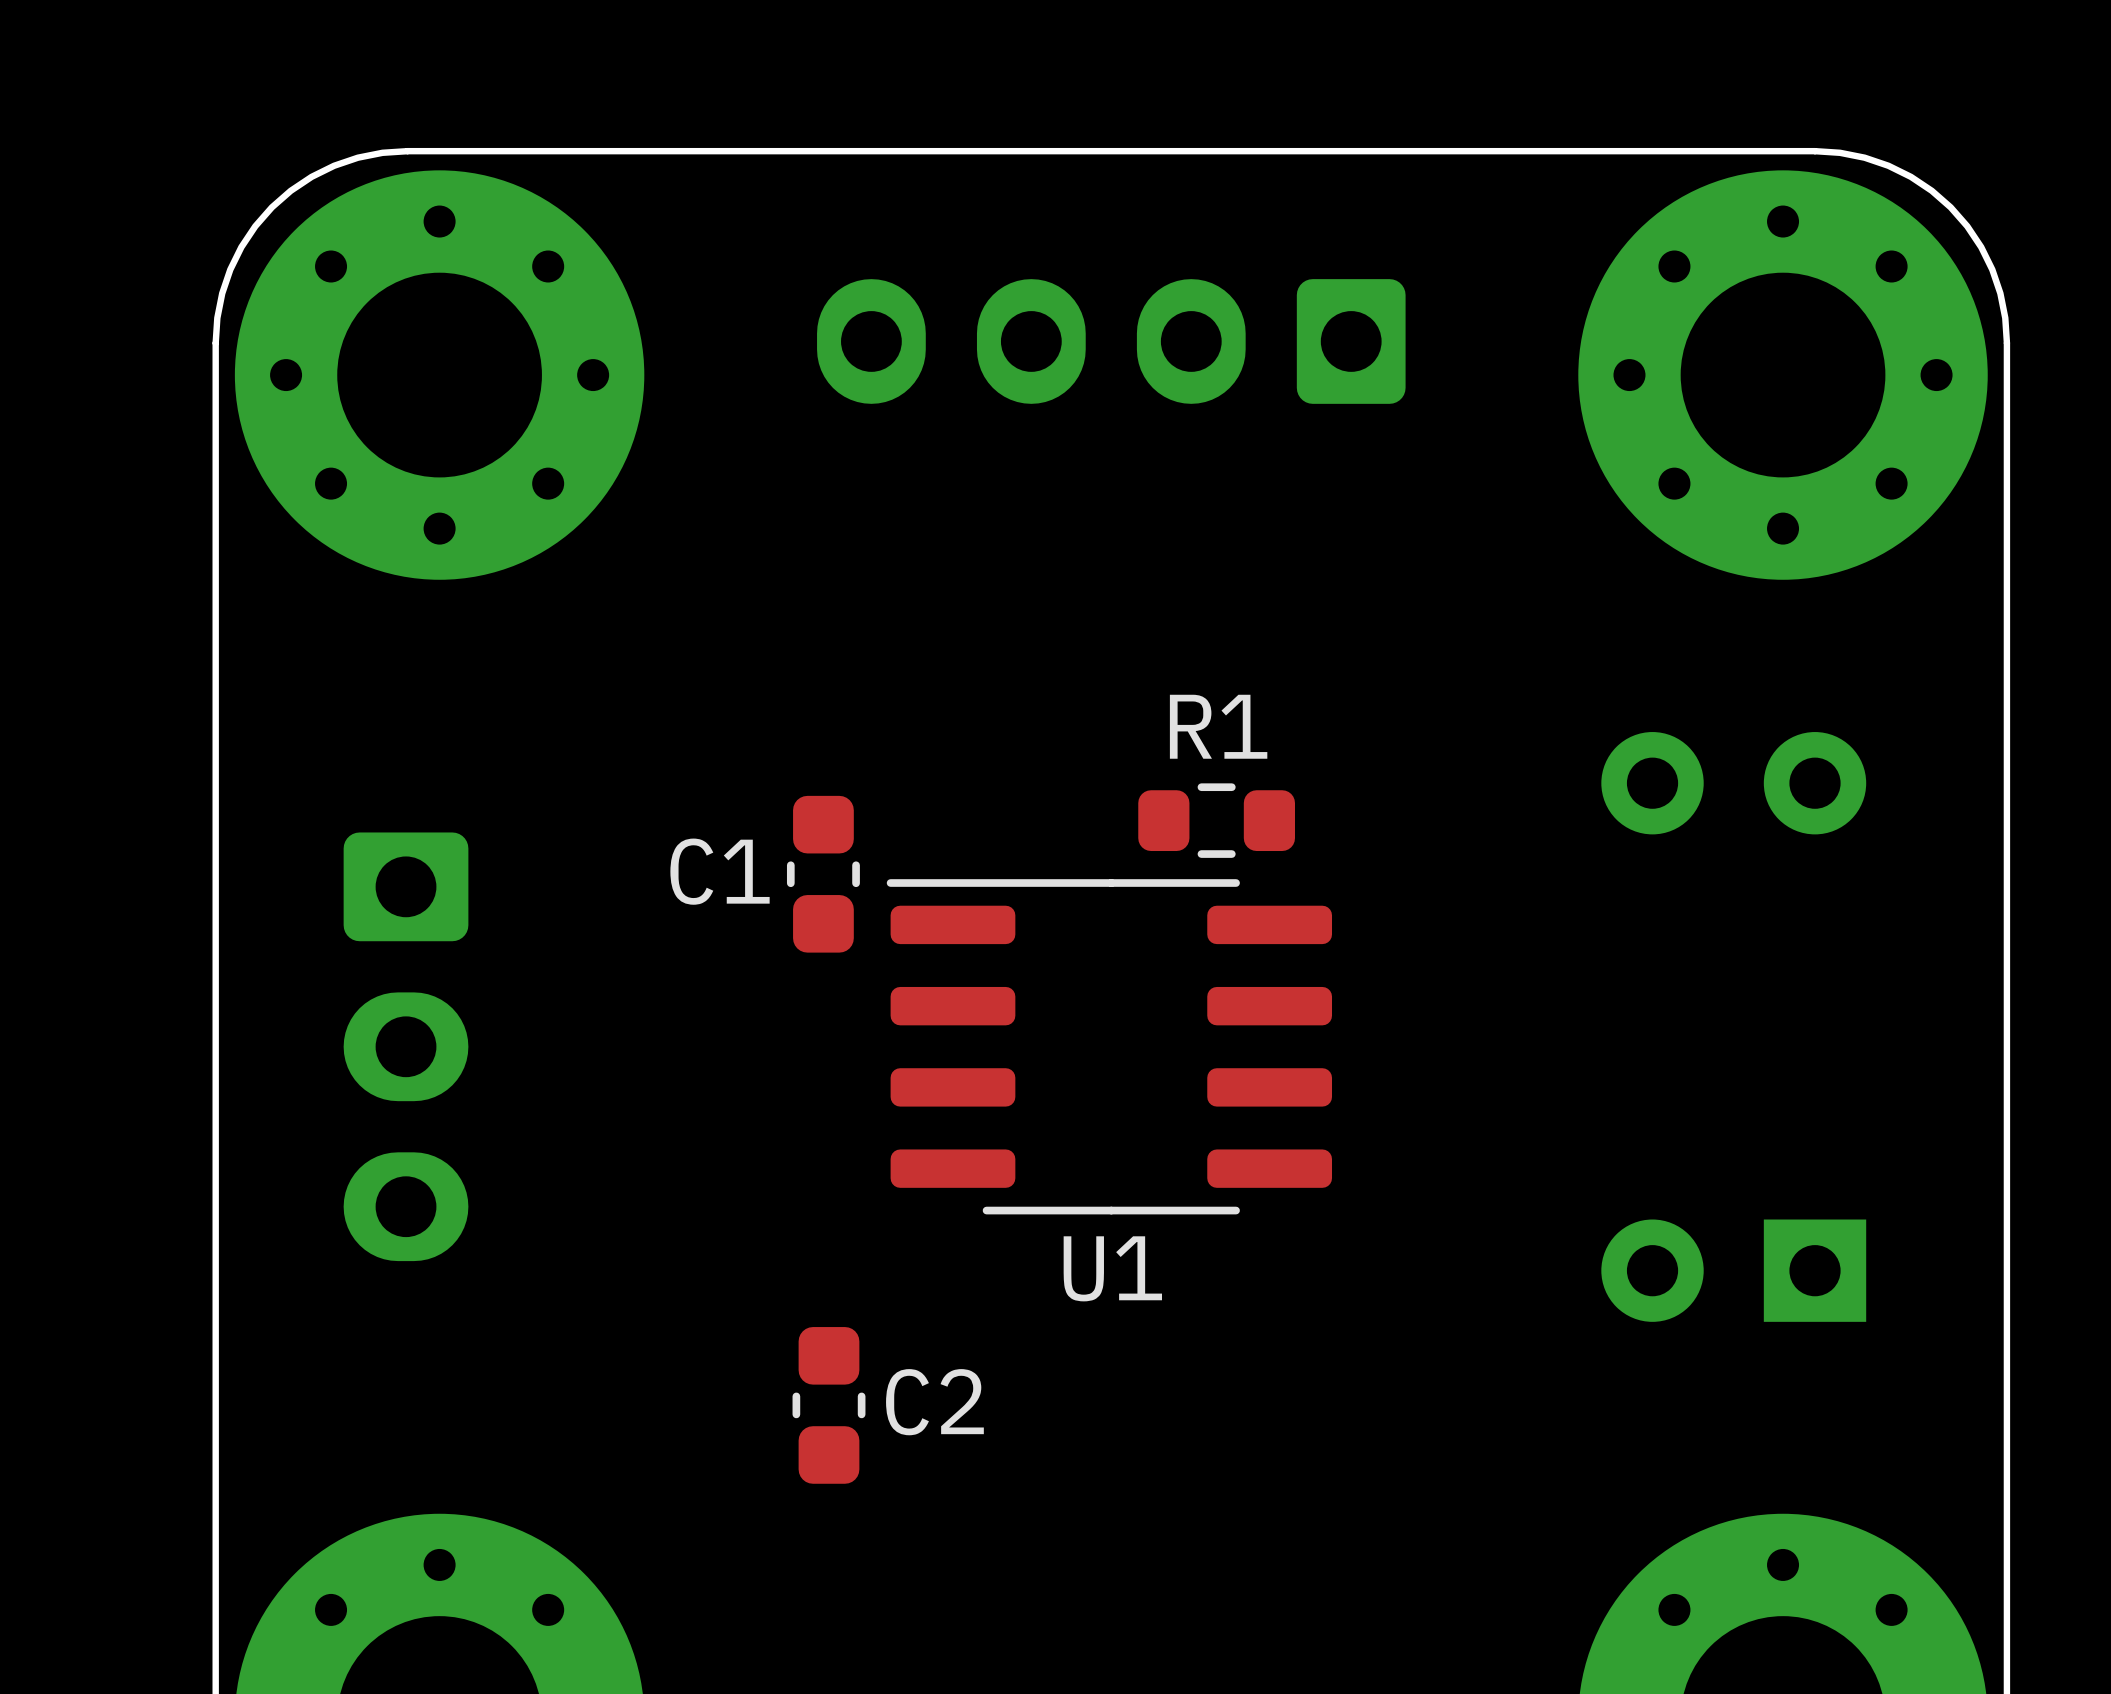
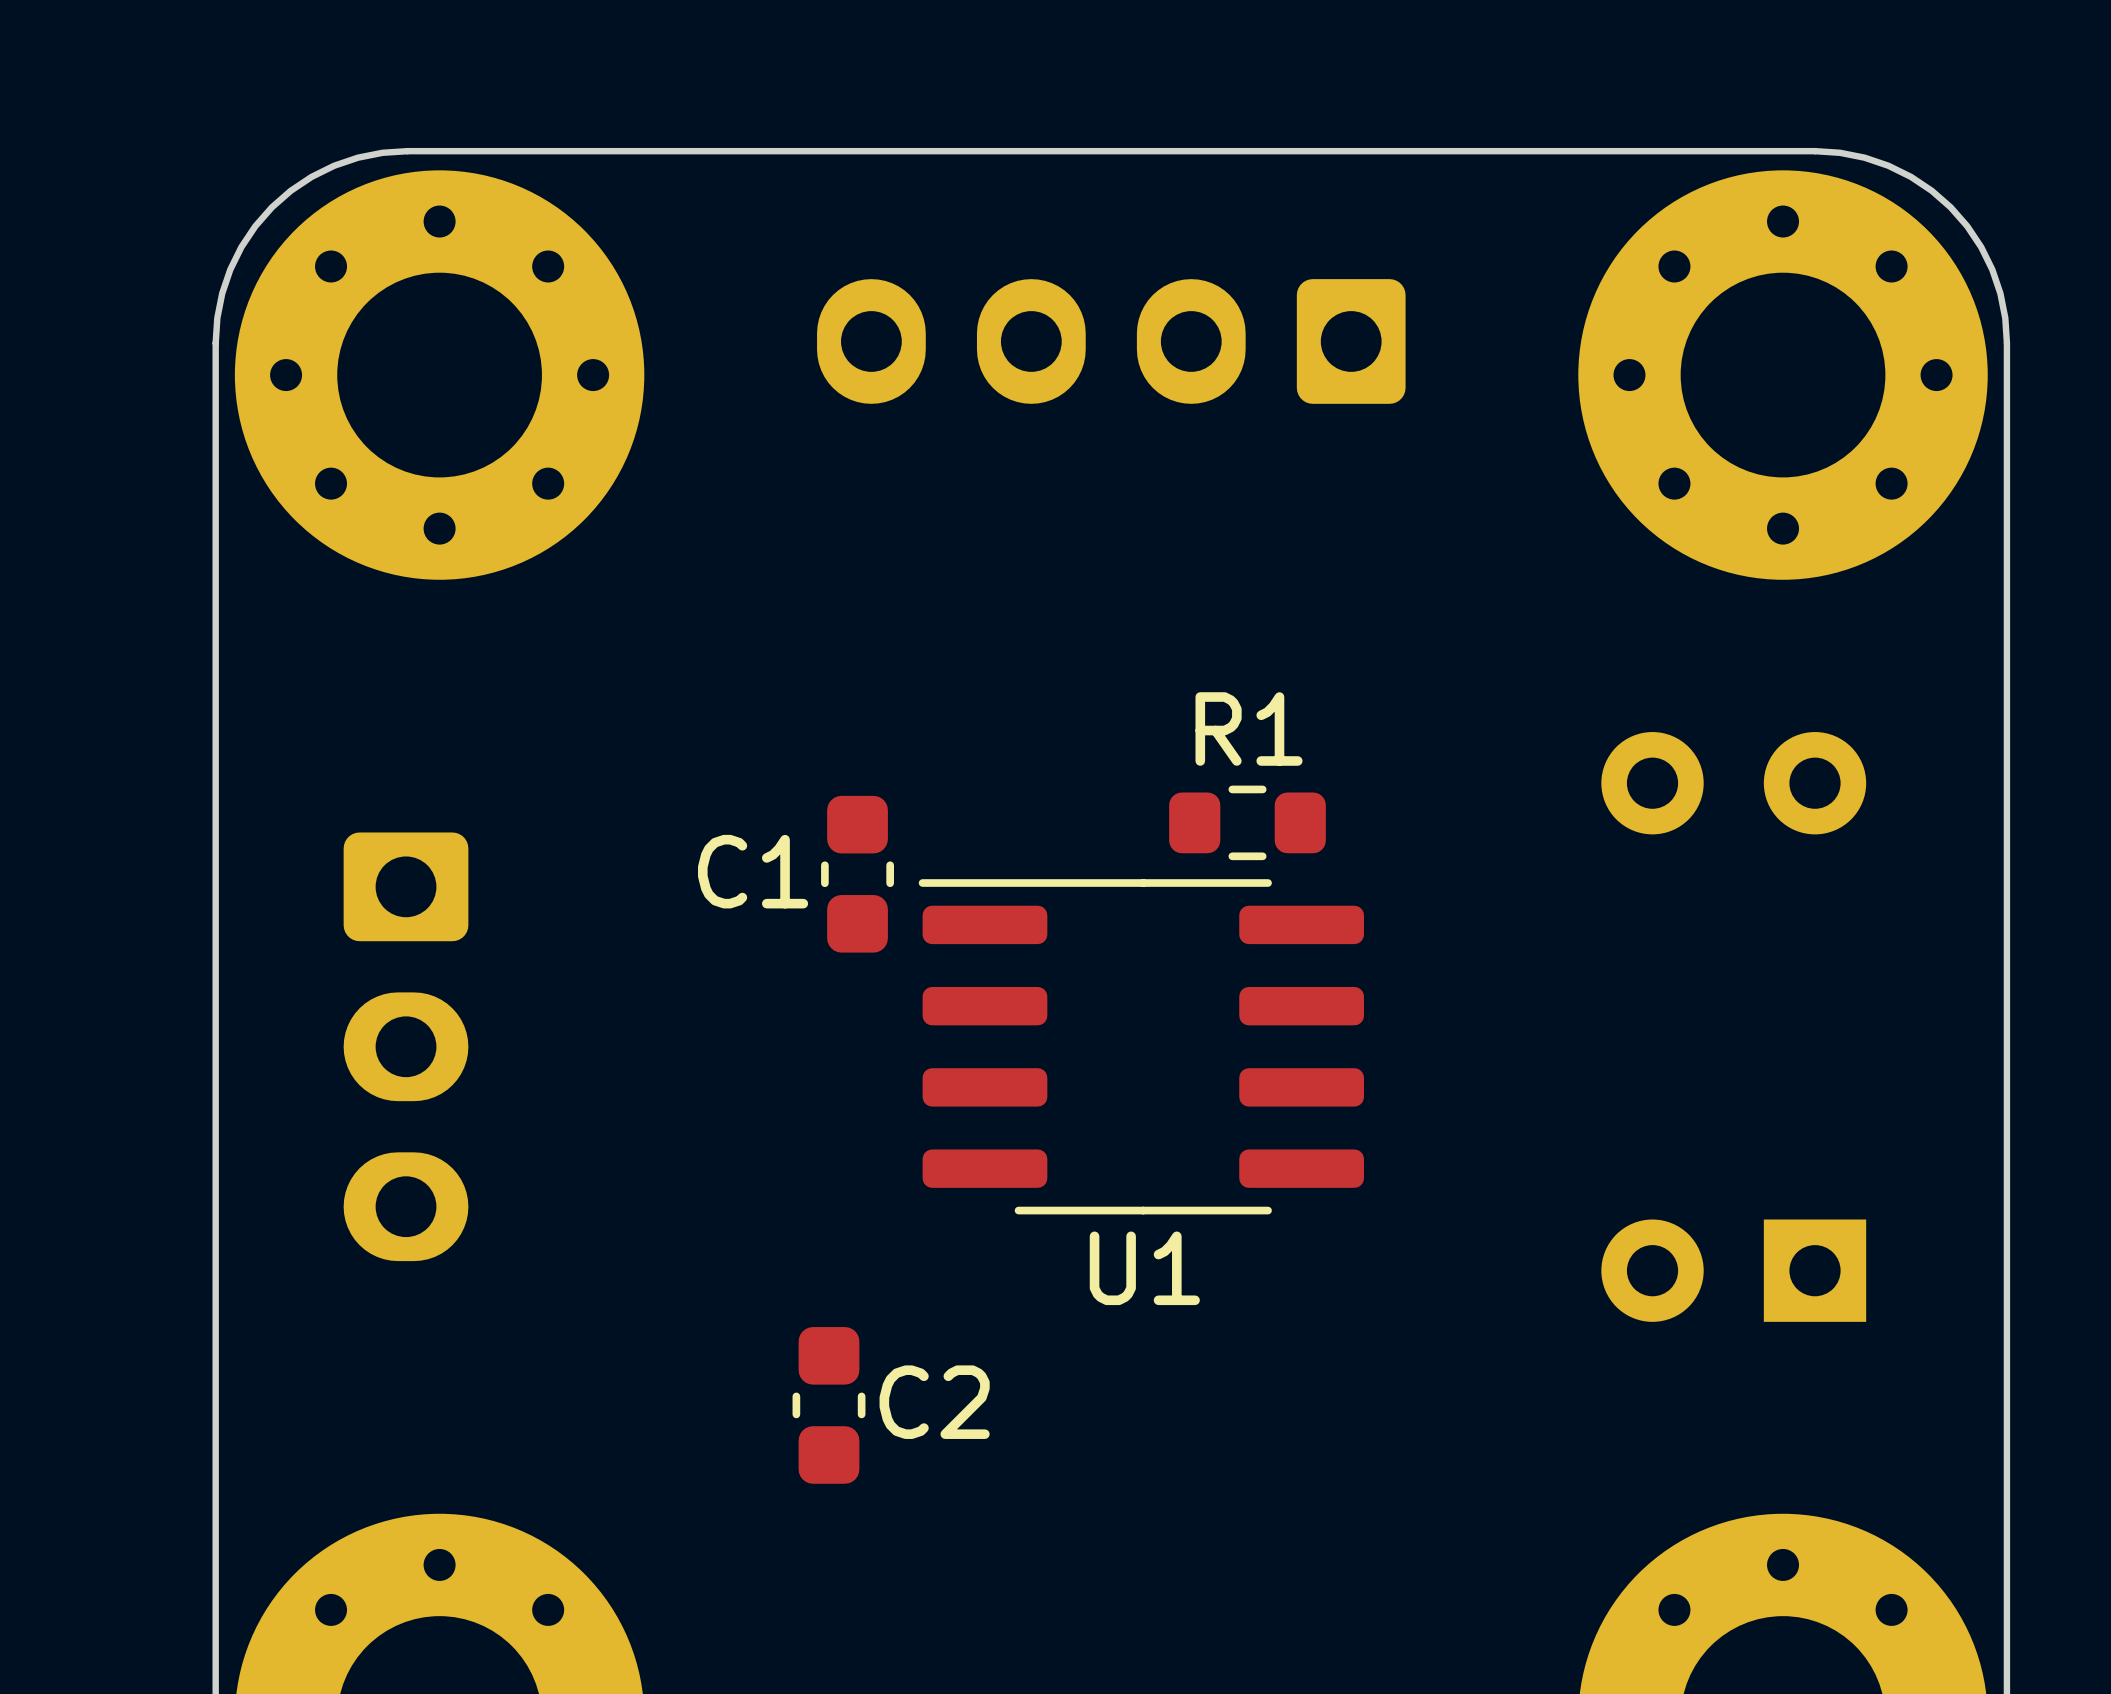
R1 position: (1216, 820) -> (1247, 822)
C1 position: (823, 874) -> (857, 874)
U1 position: (1109, 1046) -> (1141, 1046)

